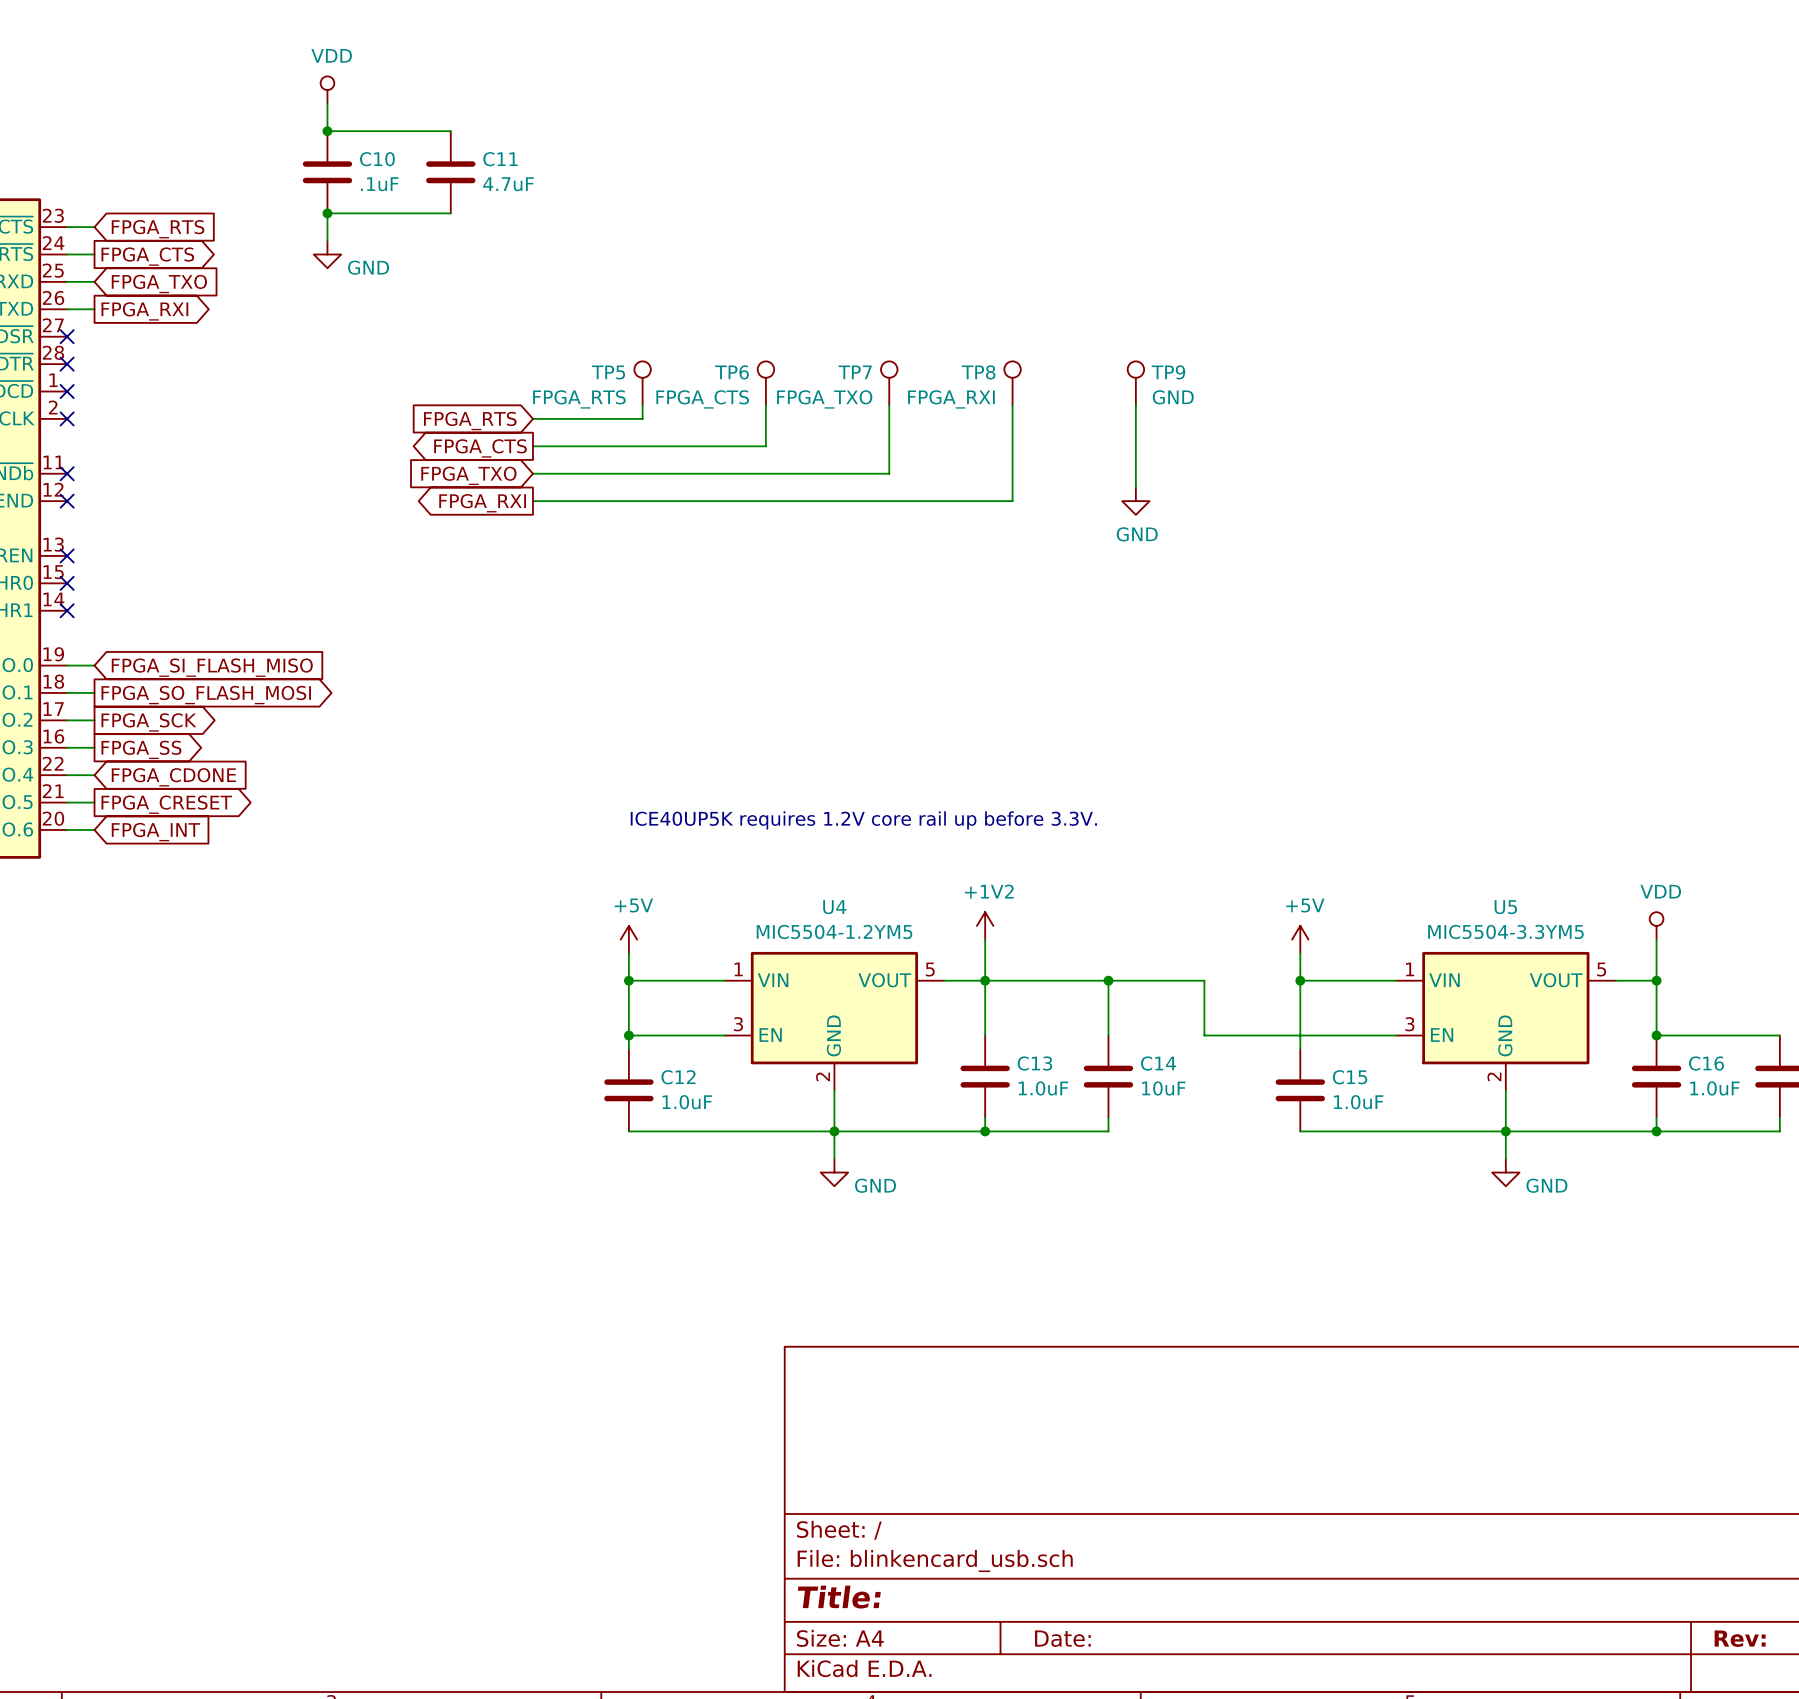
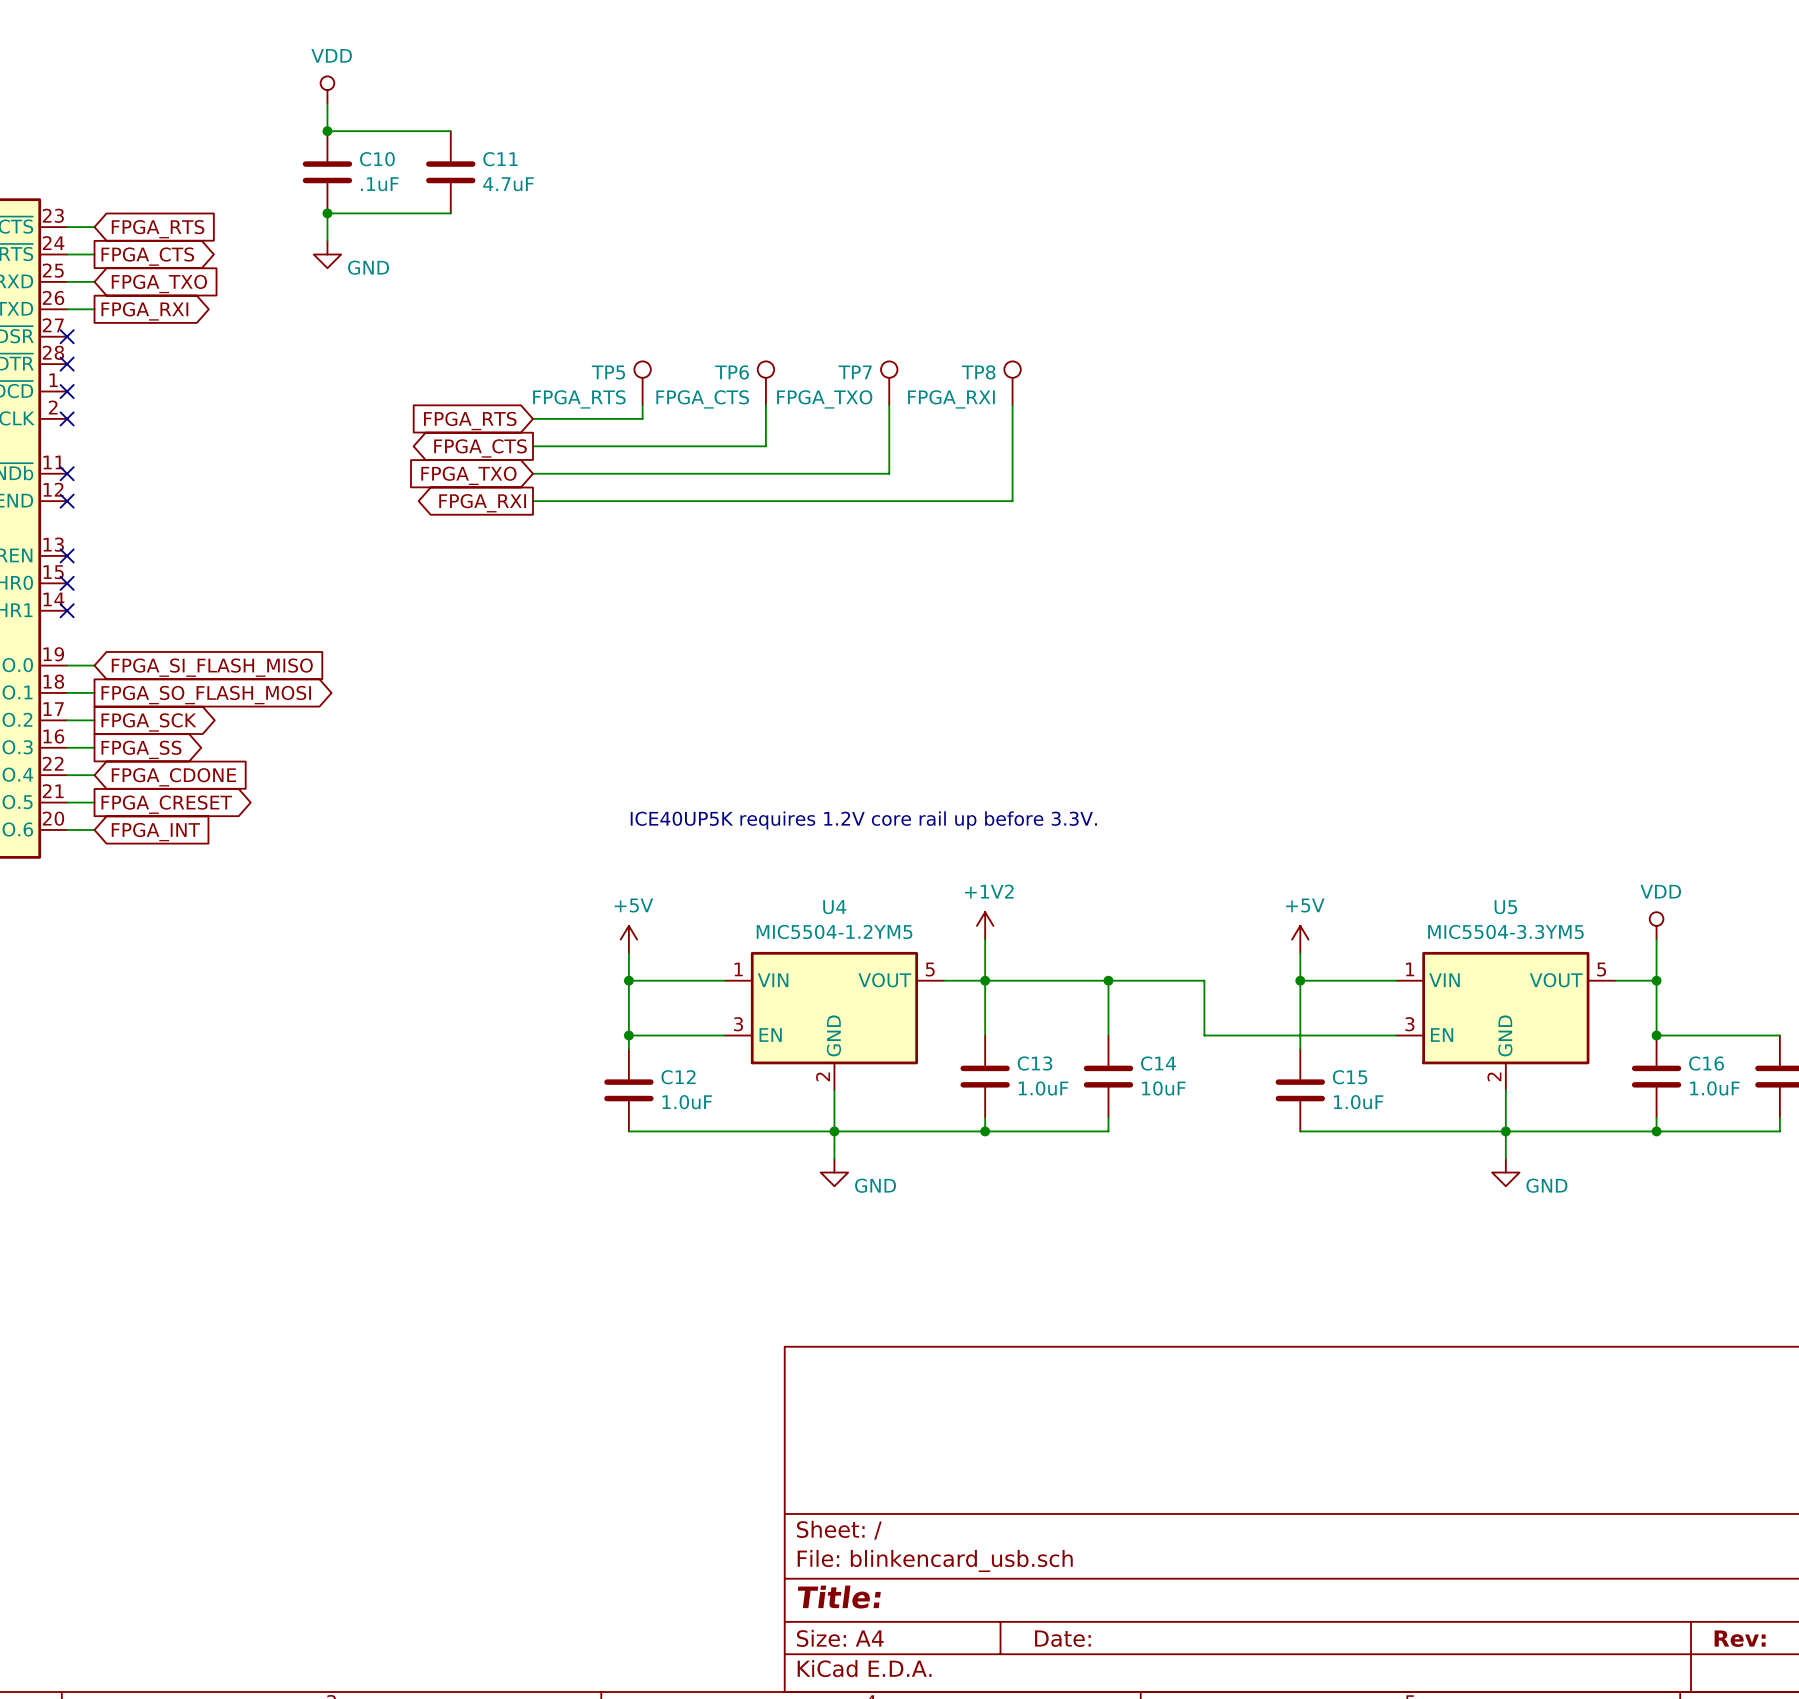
TP9: GND (1135, 383) -> none
wire: (1135, 405) (1135, 487) -> none
power symbol: GND (1135, 501) -> none

